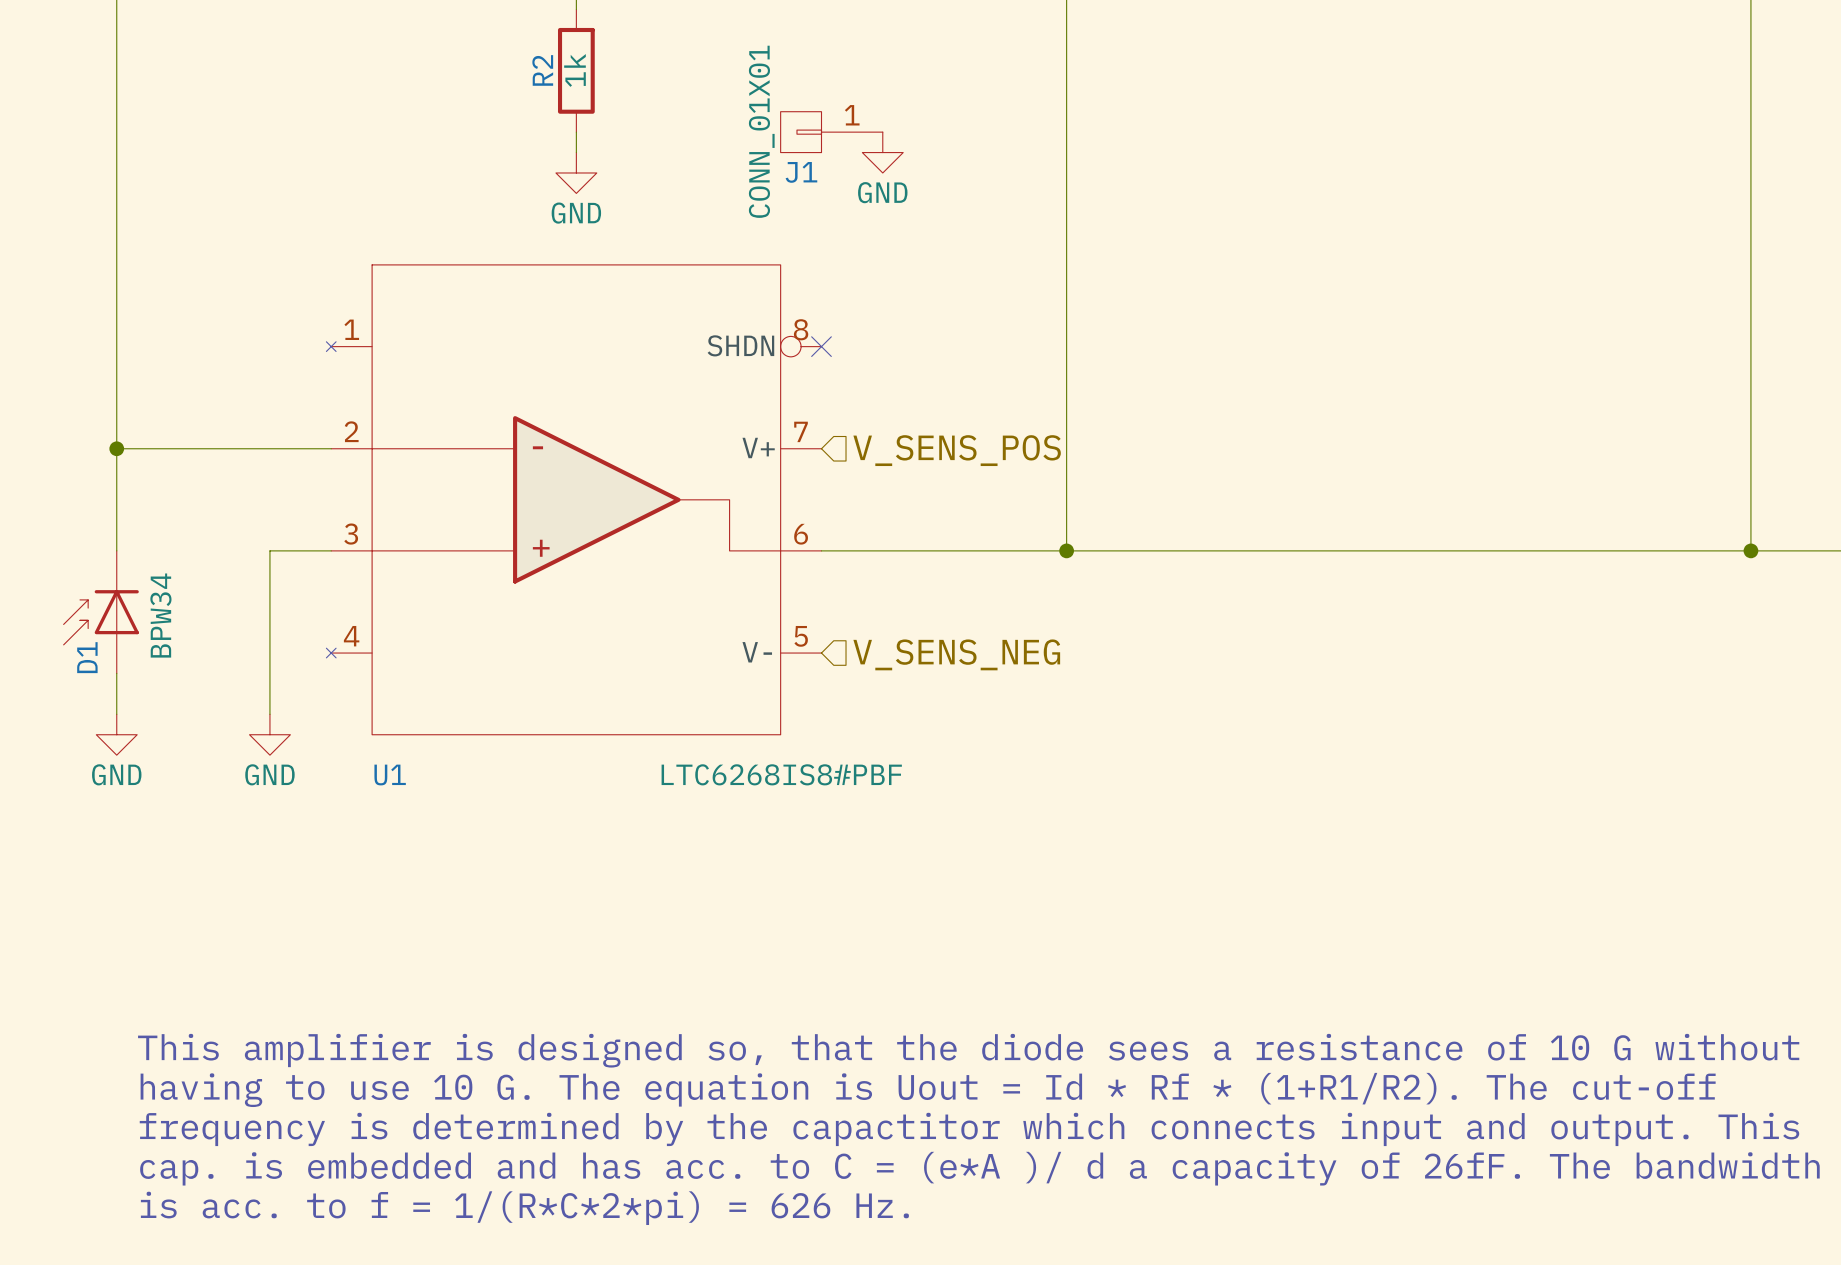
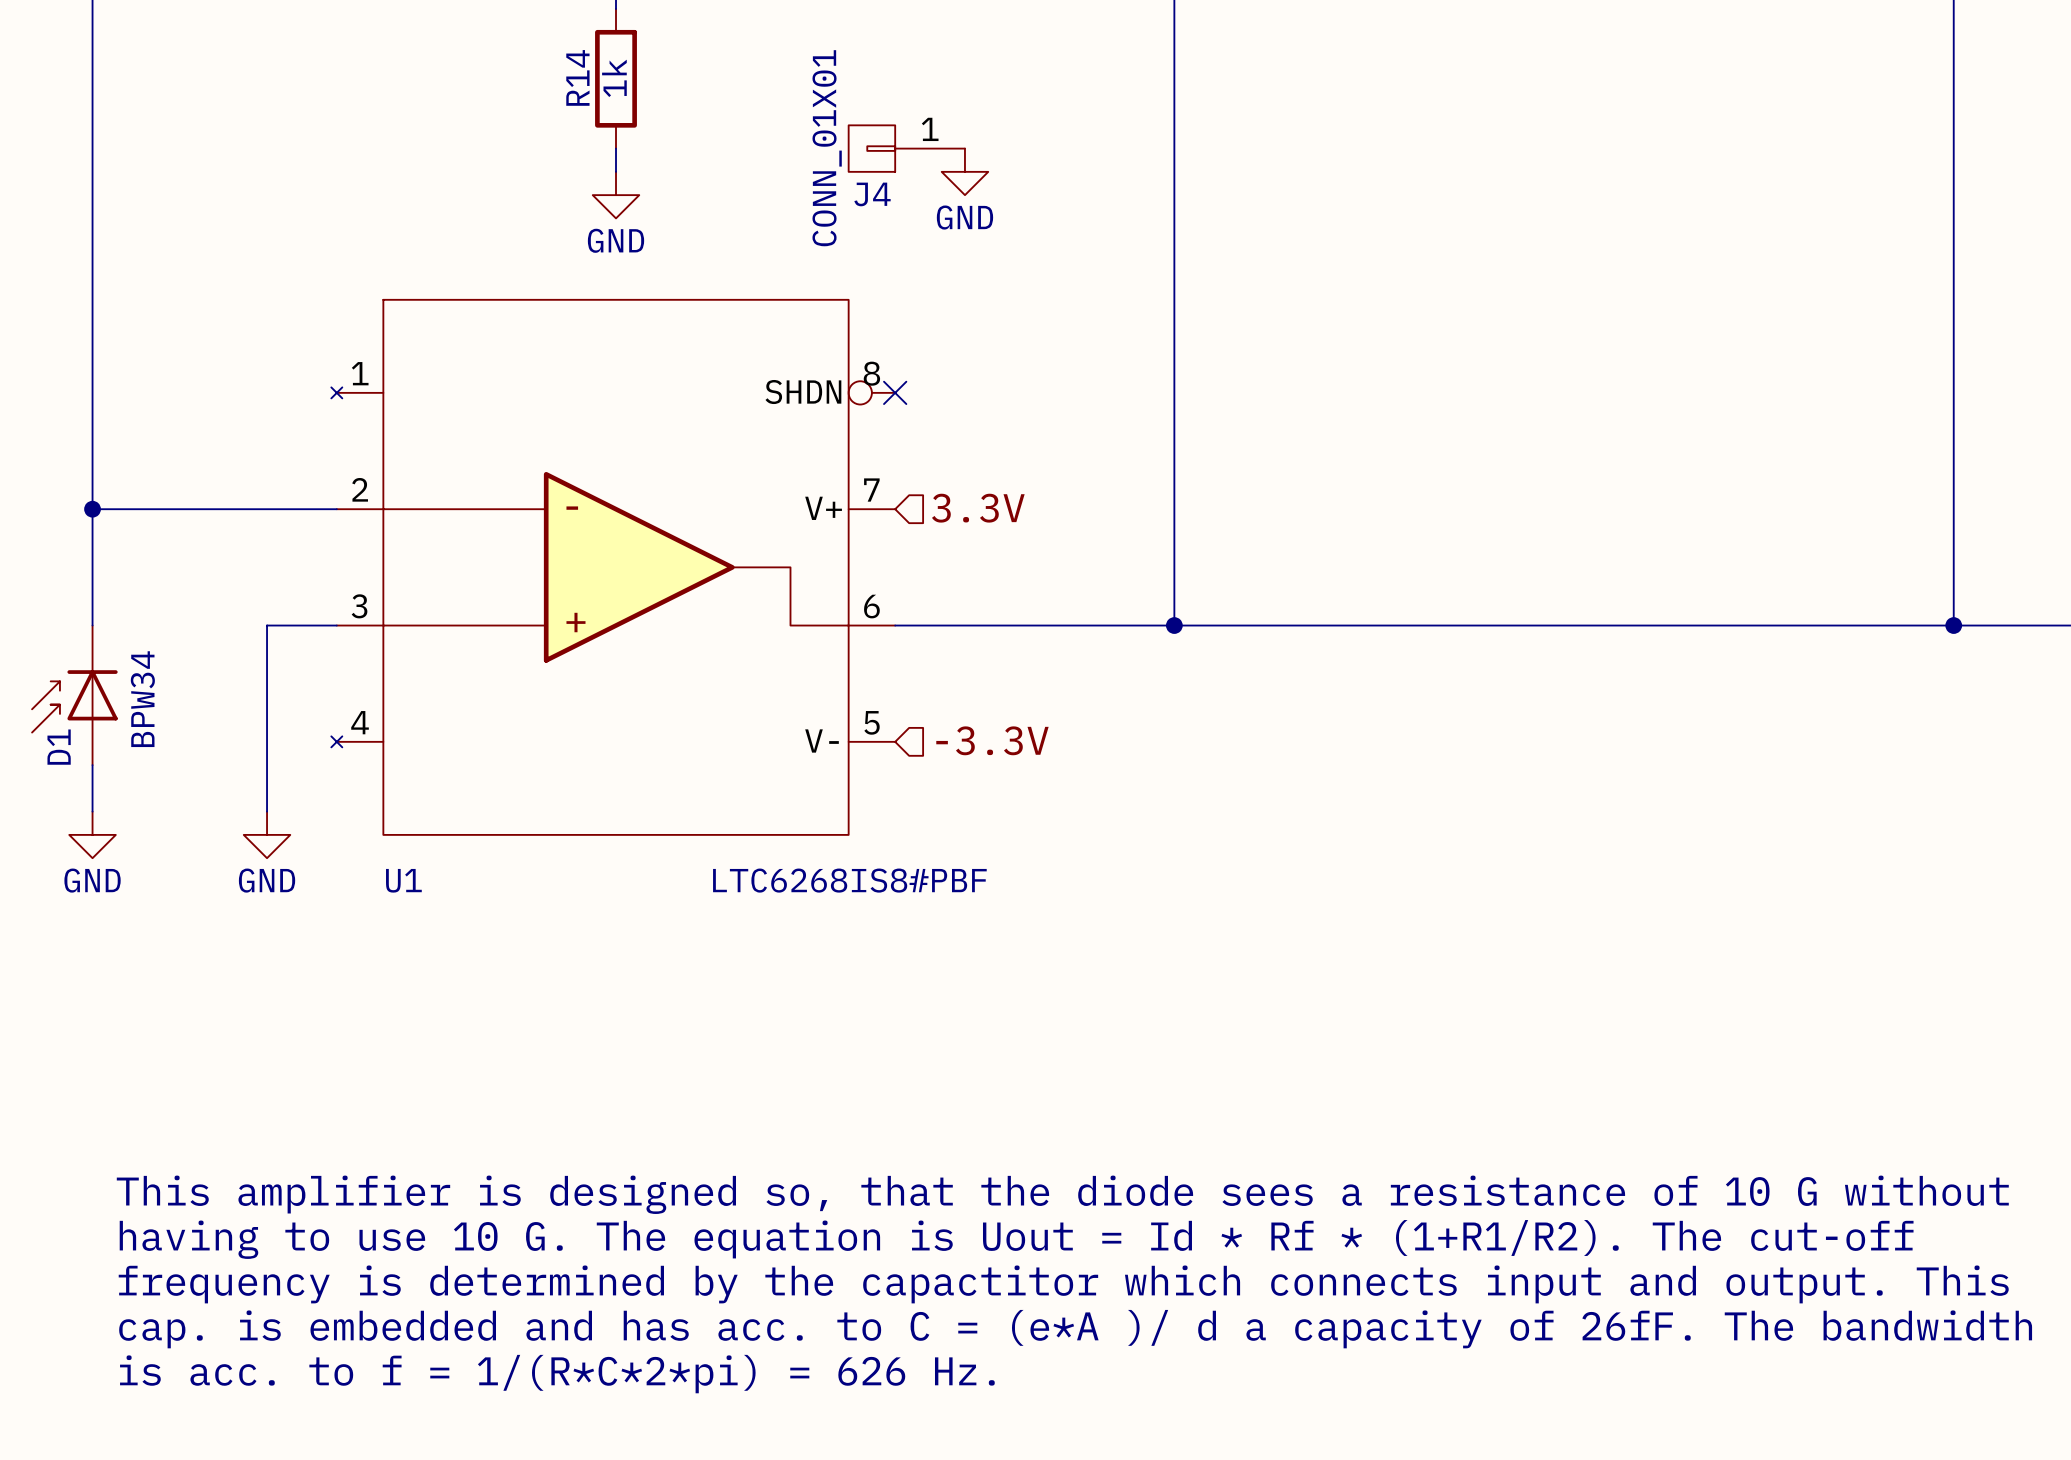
R2 name: R2 (542, 70) -> R14 (577, 77)
J1 name: J1 (801, 172) -> J4 (872, 194)
hierarchical label: V_SENS_POS (957, 450) -> 3.3V (978, 508)
hierarchical label: V_SENS_NEG (956, 654) -> -3.3V (992, 740)

